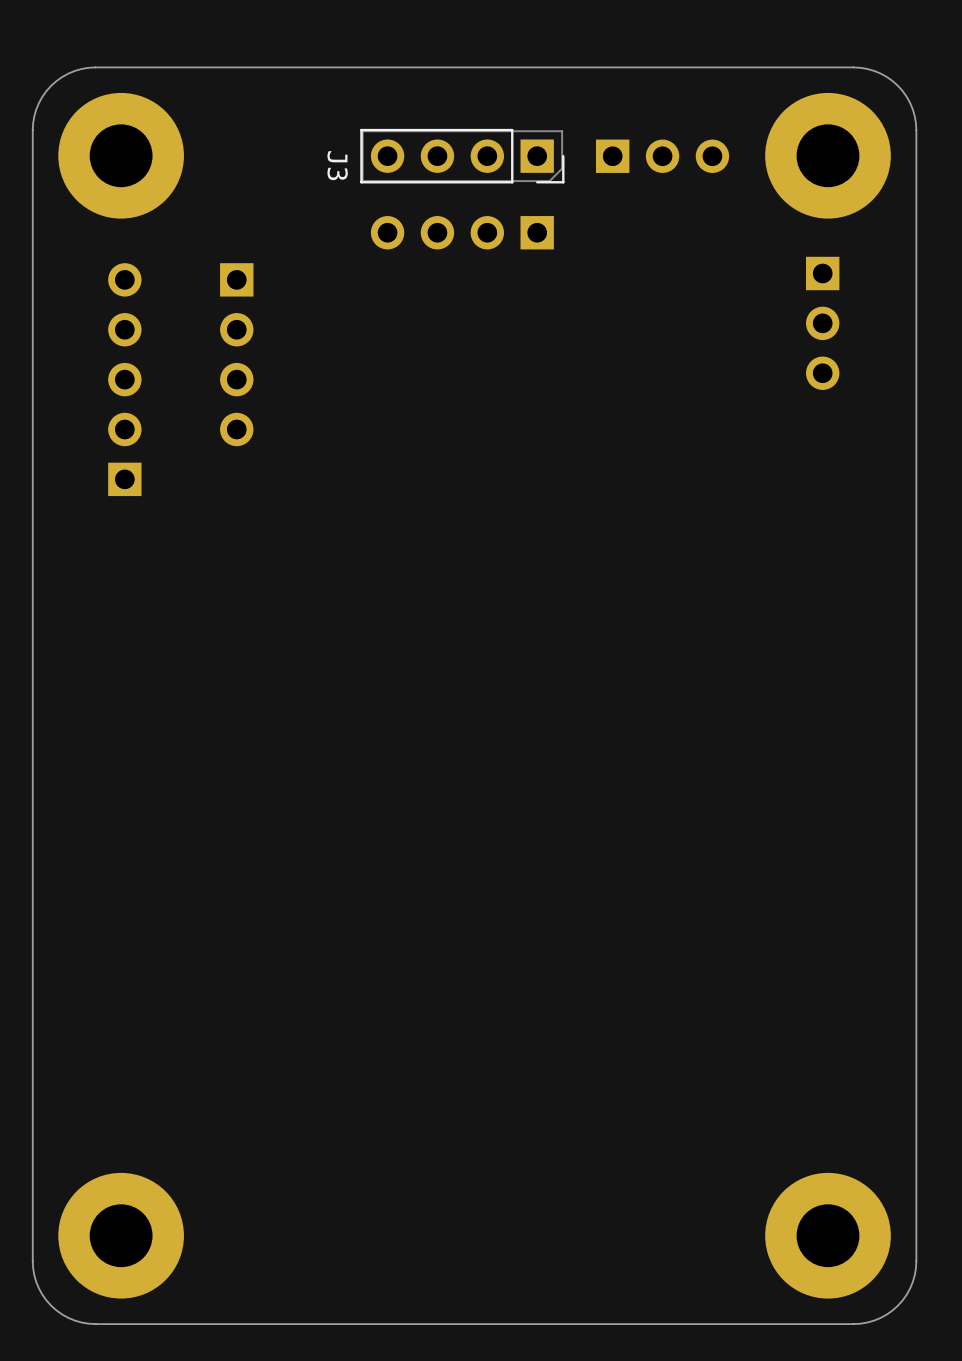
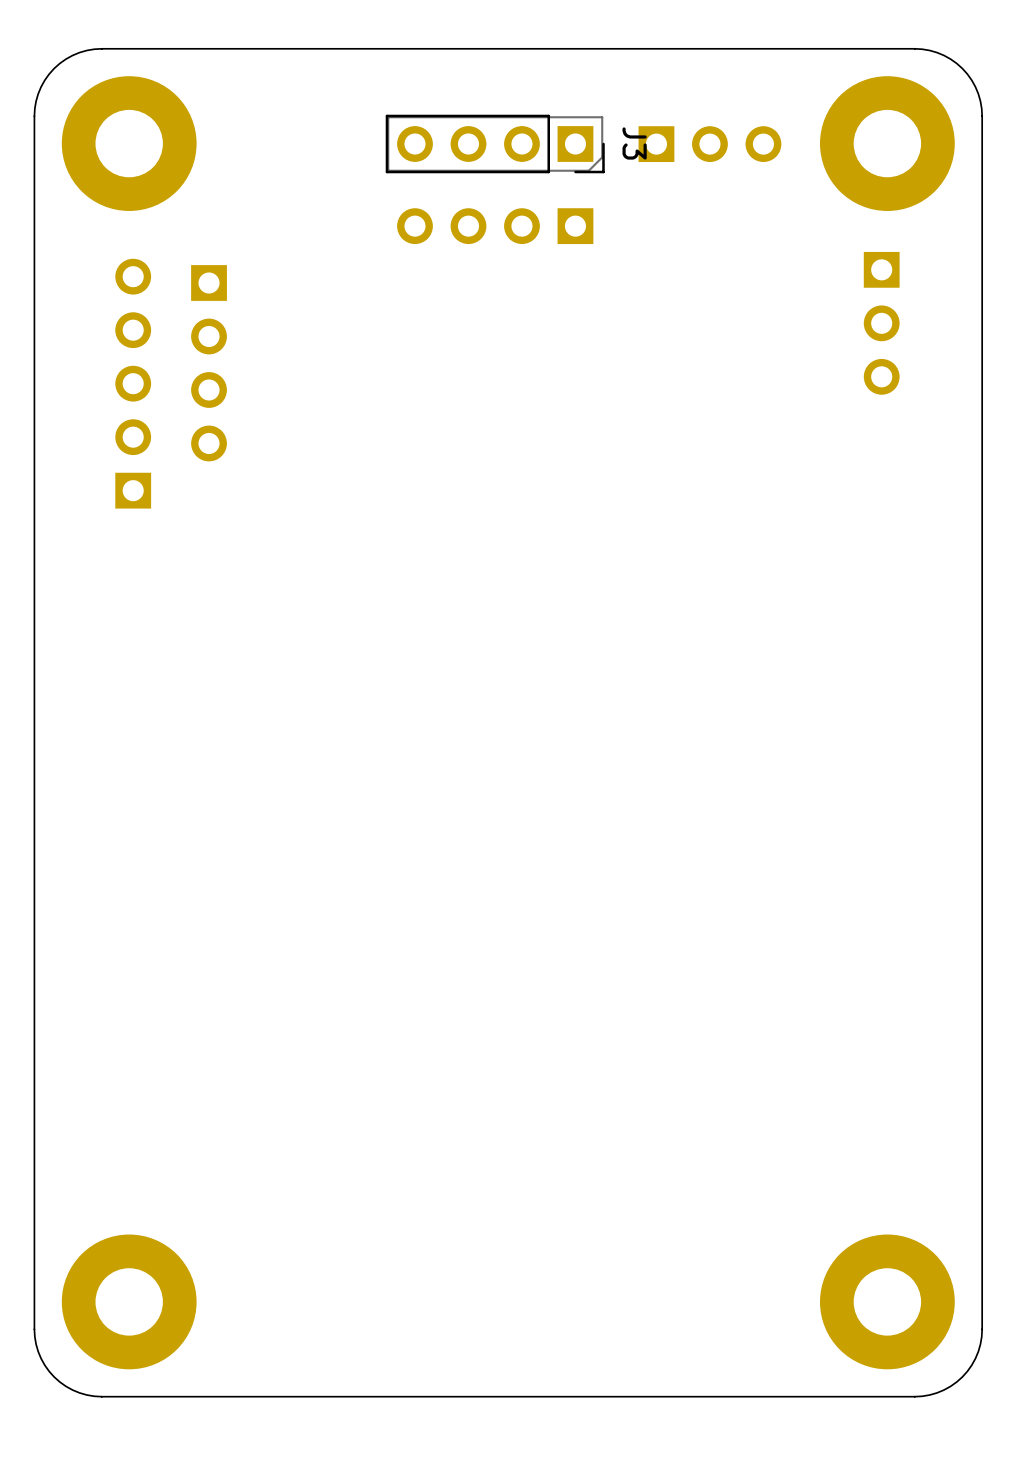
J3 name position: J3 (337, 165) -> J3 (634, 143)
part position: (236, 354) -> (209, 363)

